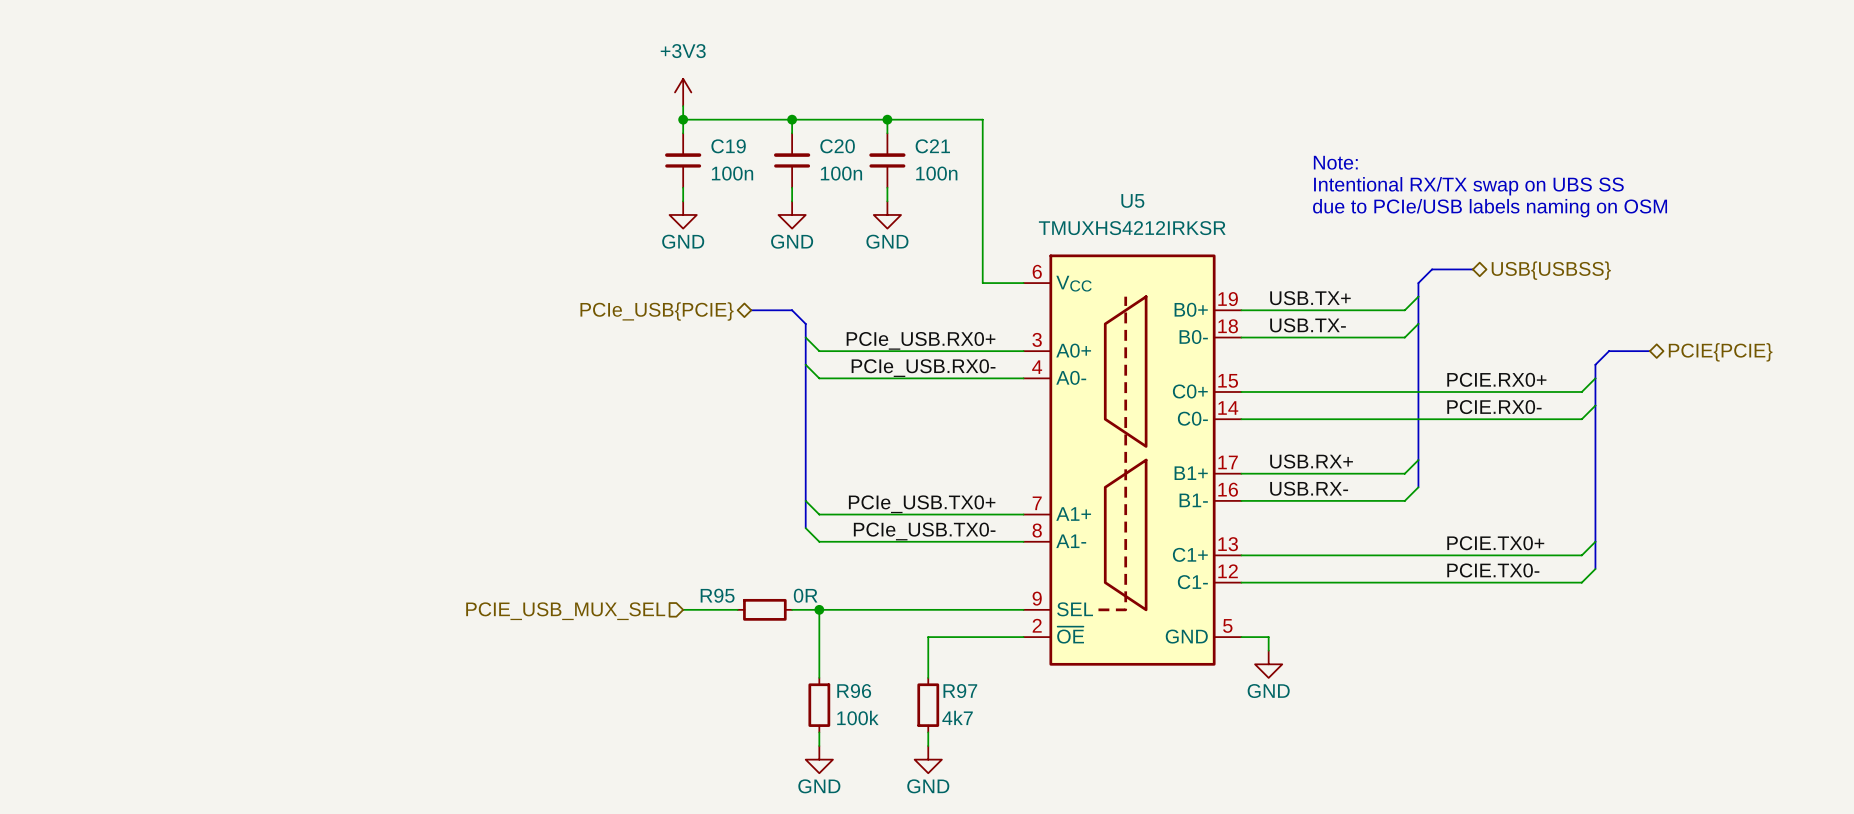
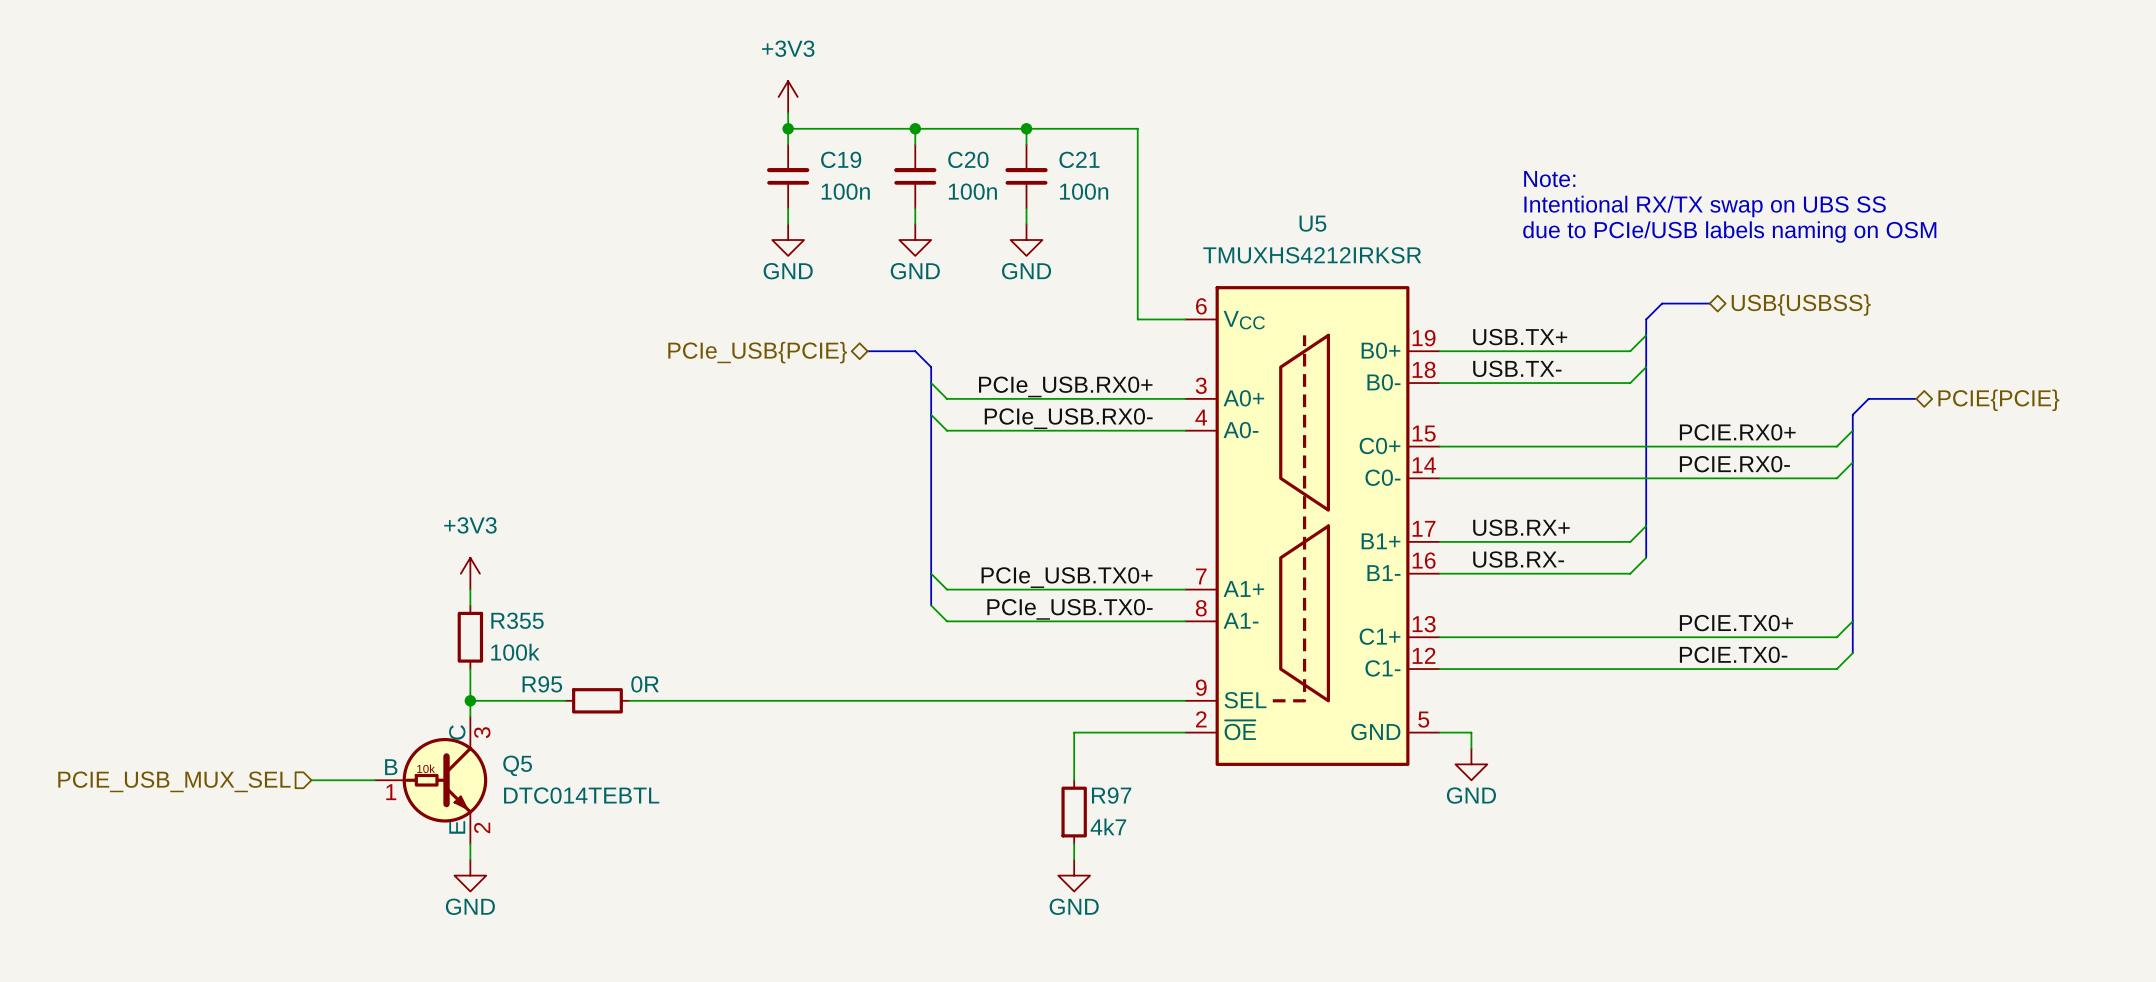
power symbol: none -> +3V3 (470, 573)
wire: none -> (470, 589) (470, 605)
R355: none -> (470, 637)
wire: none -> (470, 669) (470, 716)
wire: none -> (470, 700) (565, 700)
junction: none -> (470, 700)
wire: none -> (629, 700) (788, 700)
wire: none -> (851, 700) (915, 700)
R95 position: (764, 609) -> (597, 700)
wire: (819, 609) (819, 677) -> none
junction: (819, 609) -> none
hierarchical label: PCIE_USB_MUX_SEL (565, 611) -> none
wire: none -> (311, 780) (375, 780)
Q5: none -> (431, 780)
hierarchical label: none -> PCIE_USB_MUX_SEL (174, 781)
R96: (819, 705) -> none
wire: none -> (470, 843) (470, 859)
wire: (819, 732) (819, 746) -> none
power symbol: none -> GND (470, 875)
power symbol: GND (819, 759) -> none

